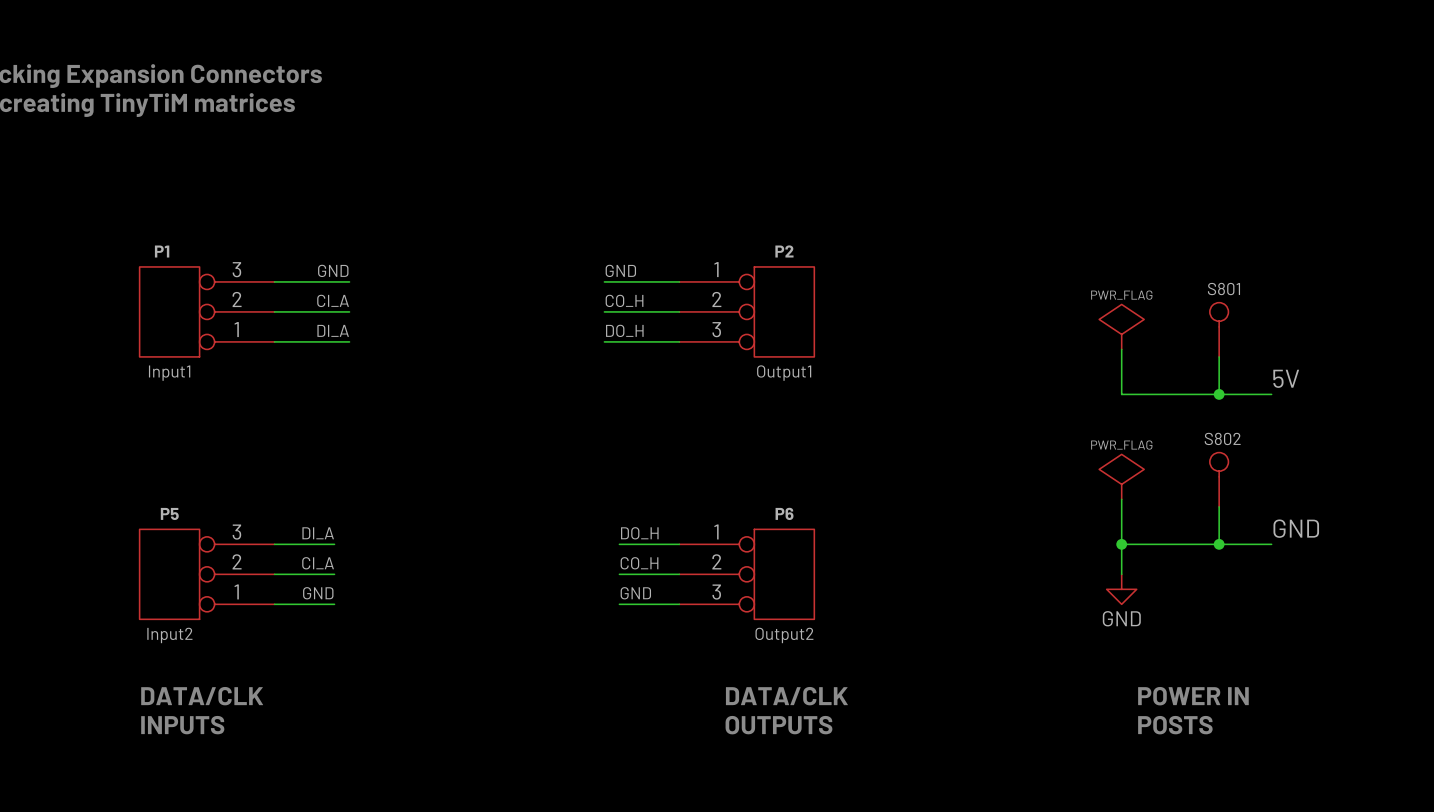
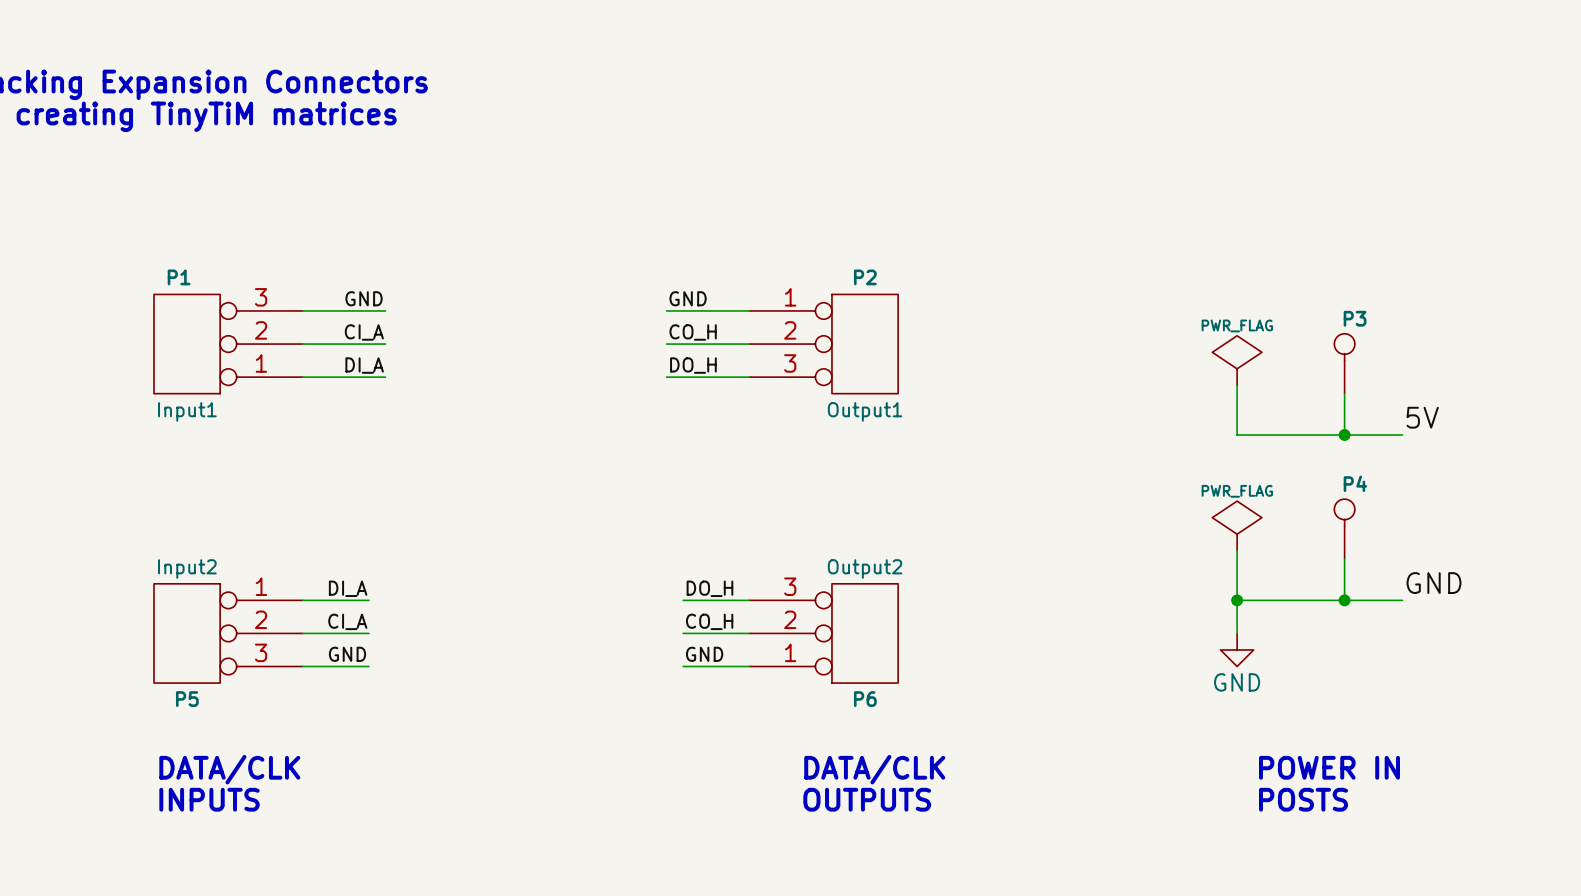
S801 name: S801 (1223, 289) -> P3 (1355, 318)
S802 name: S802 (1222, 438) -> P4 (1355, 483)
P5 flip: as is (169, 574) -> up-down (187, 633)
P6 flip: as is (784, 574) -> up-down (865, 633)

